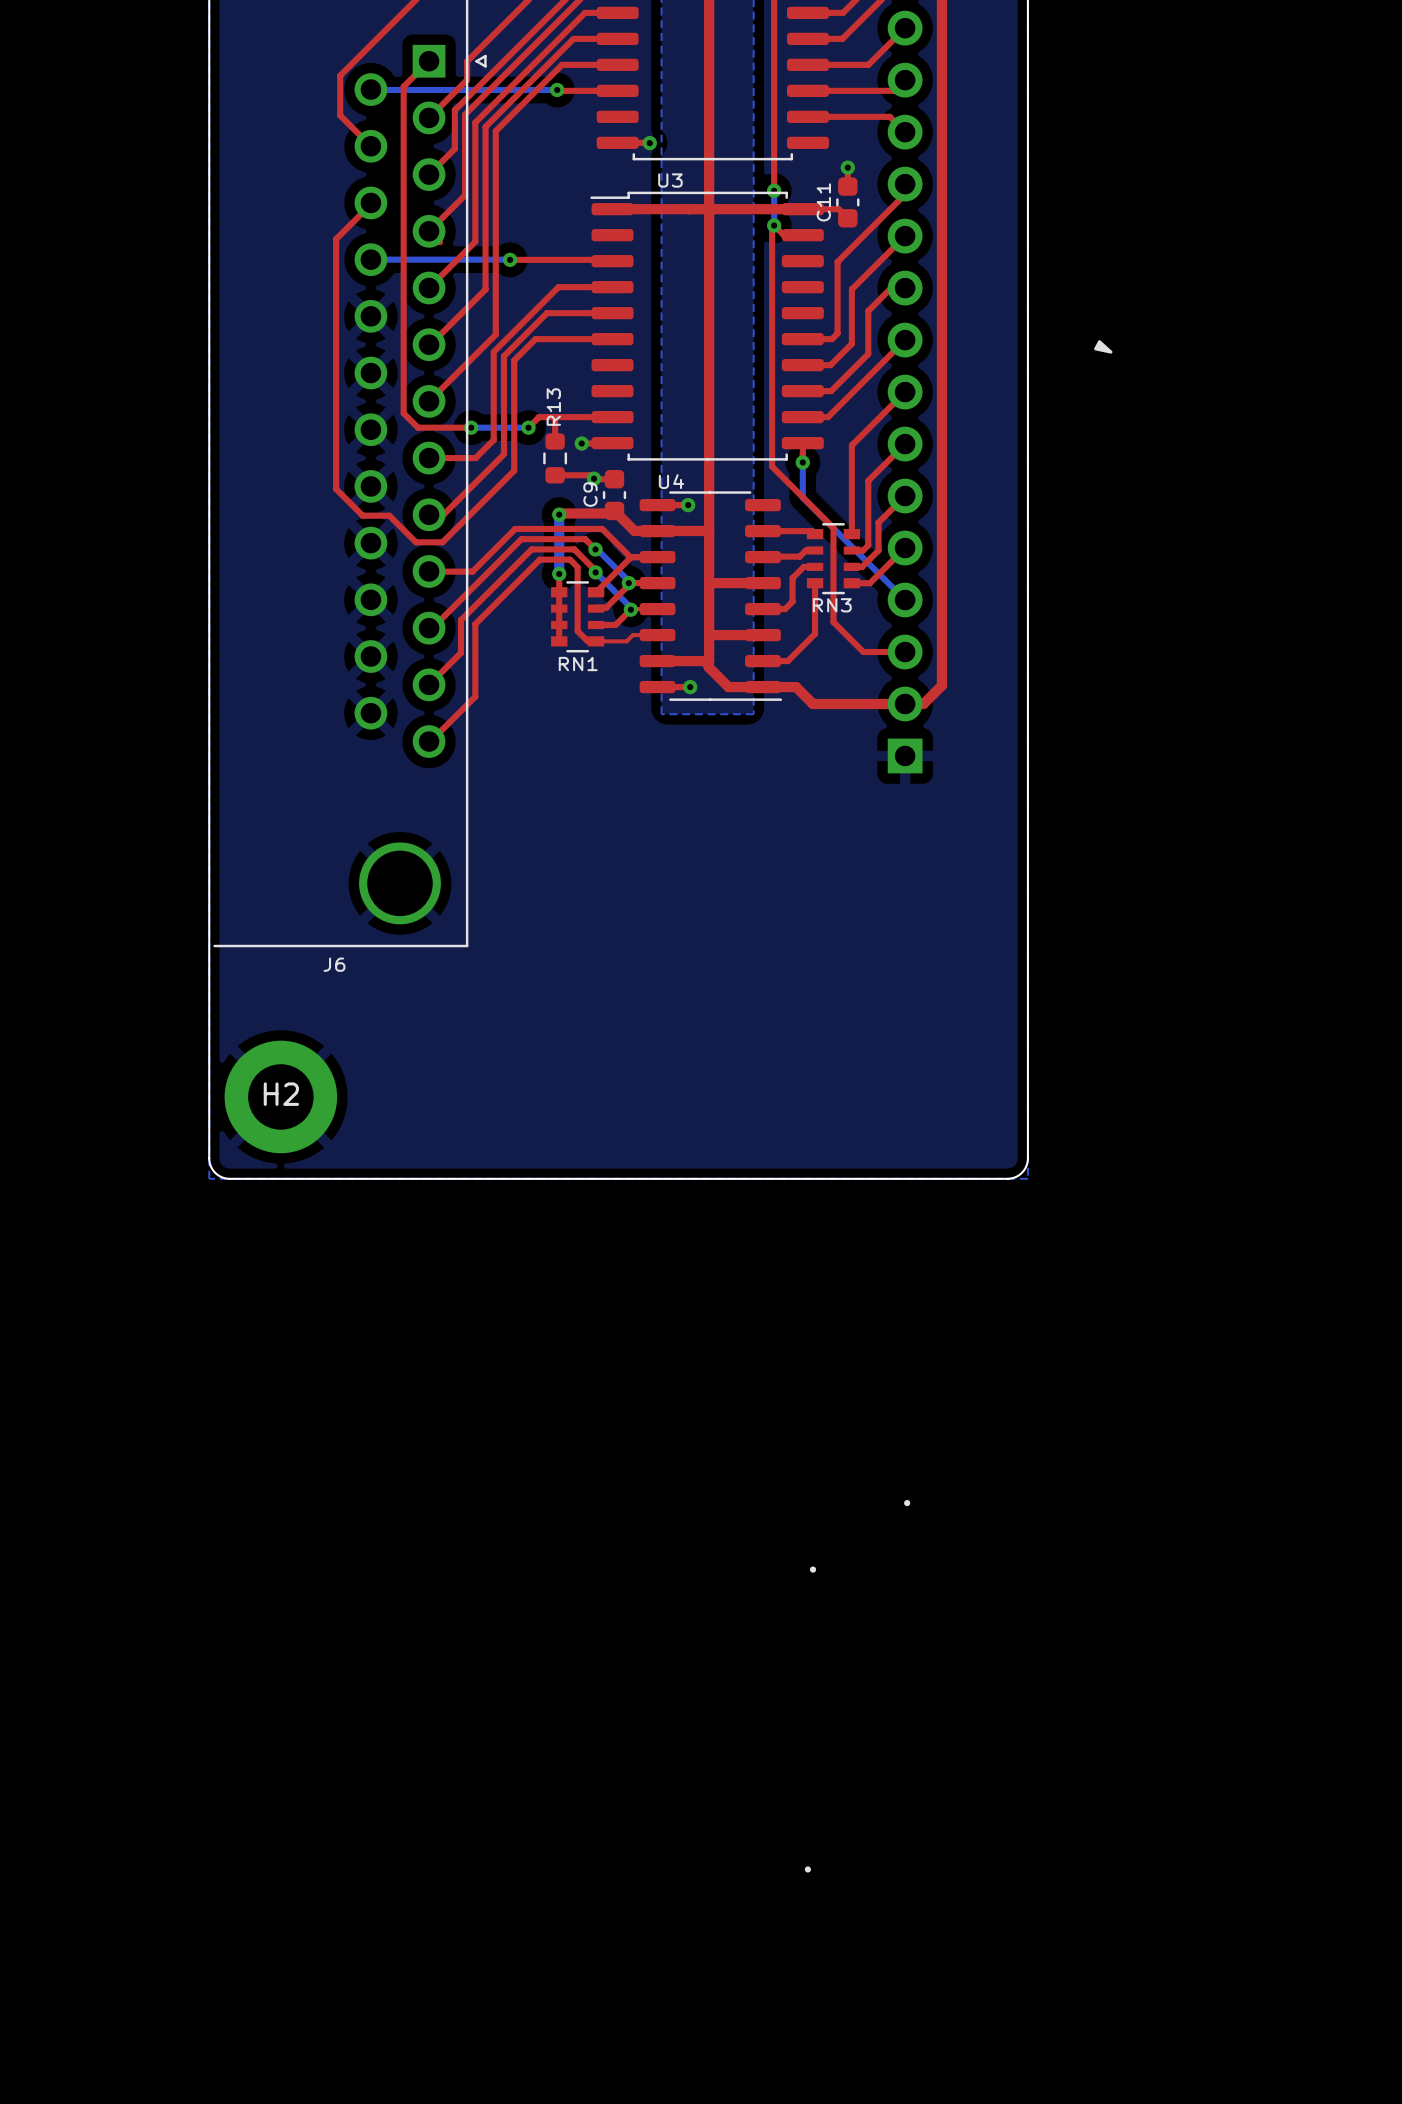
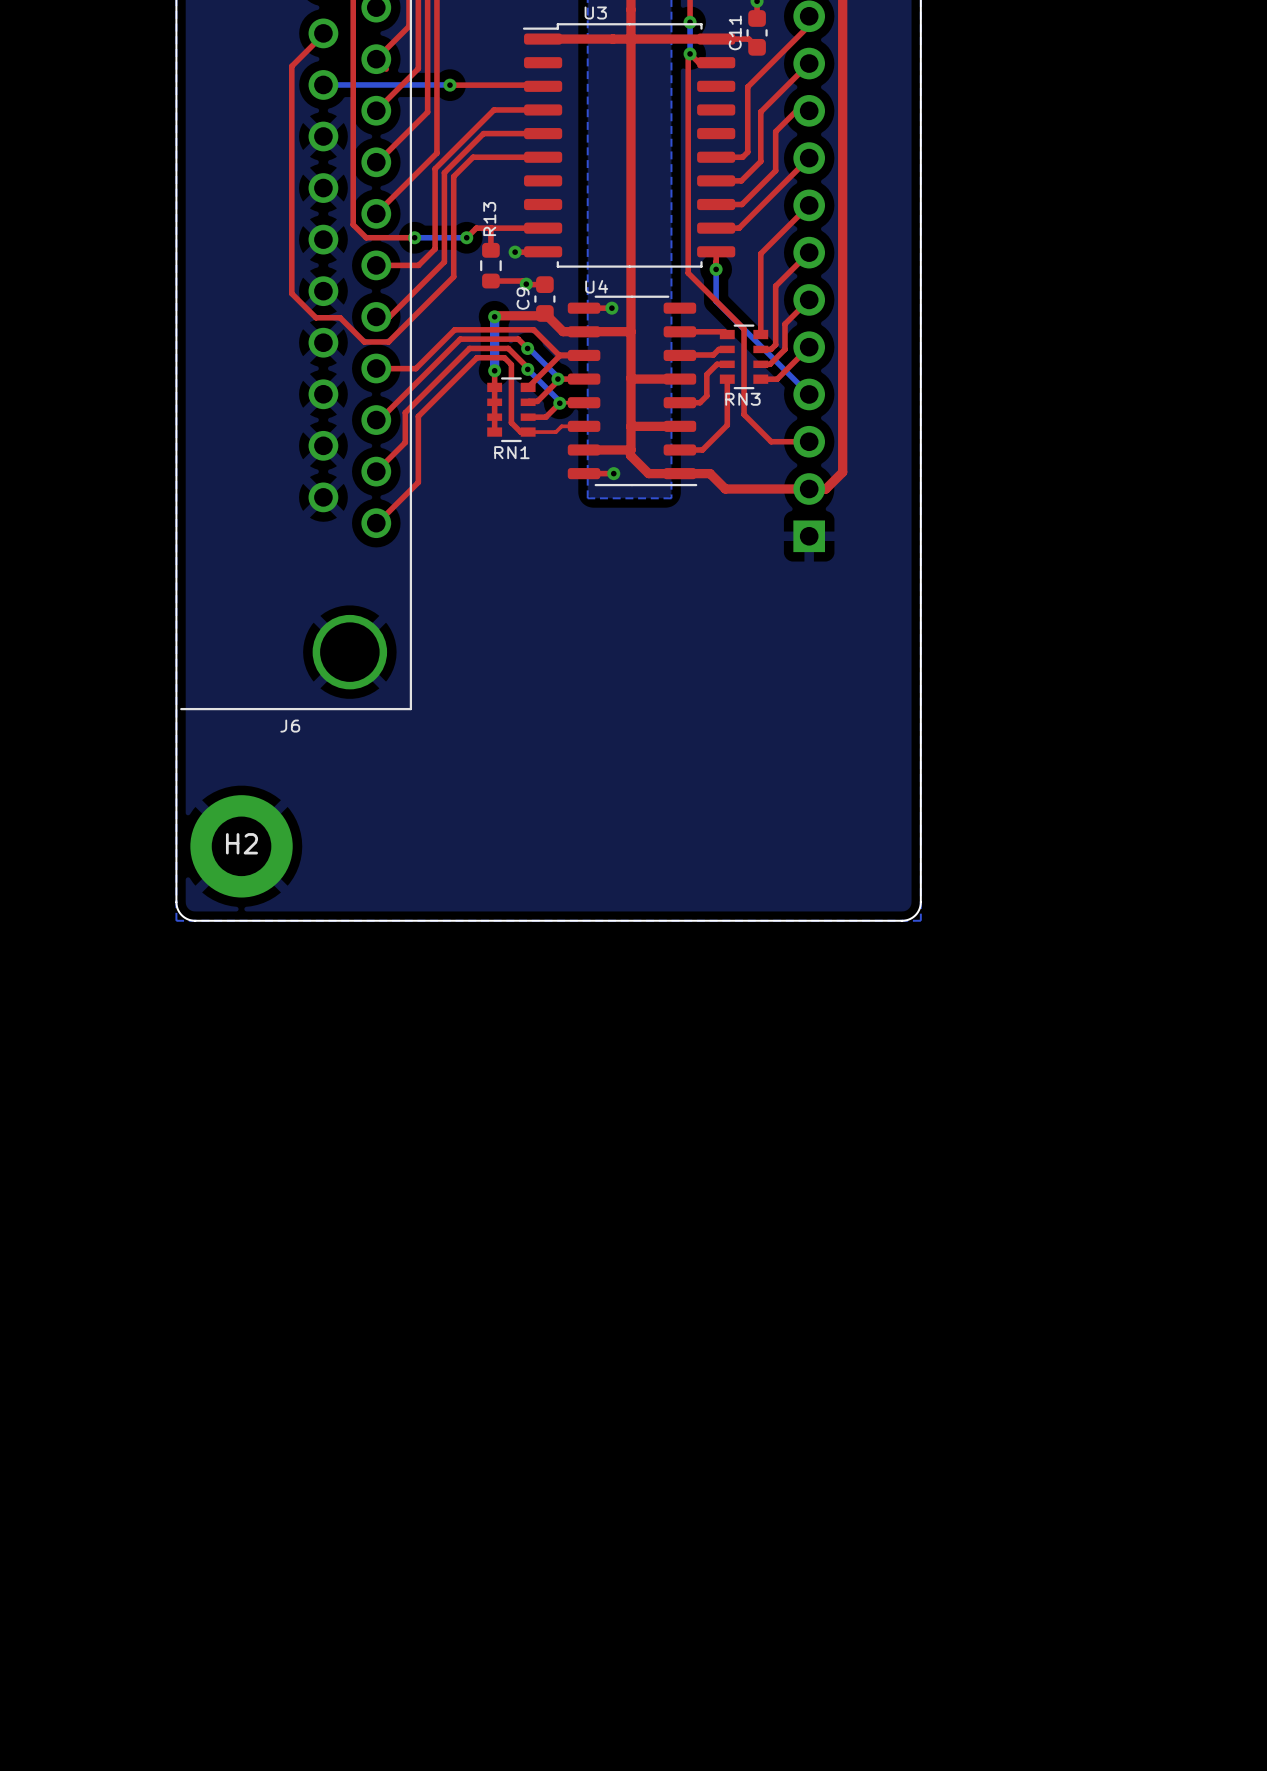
drawing: [1094, 340, 1113, 354] -> none
drawing: [904, 1500, 911, 1507] -> none
drawing: [809, 1566, 817, 1573] -> none
drawing: [804, 1866, 811, 1873] -> none

